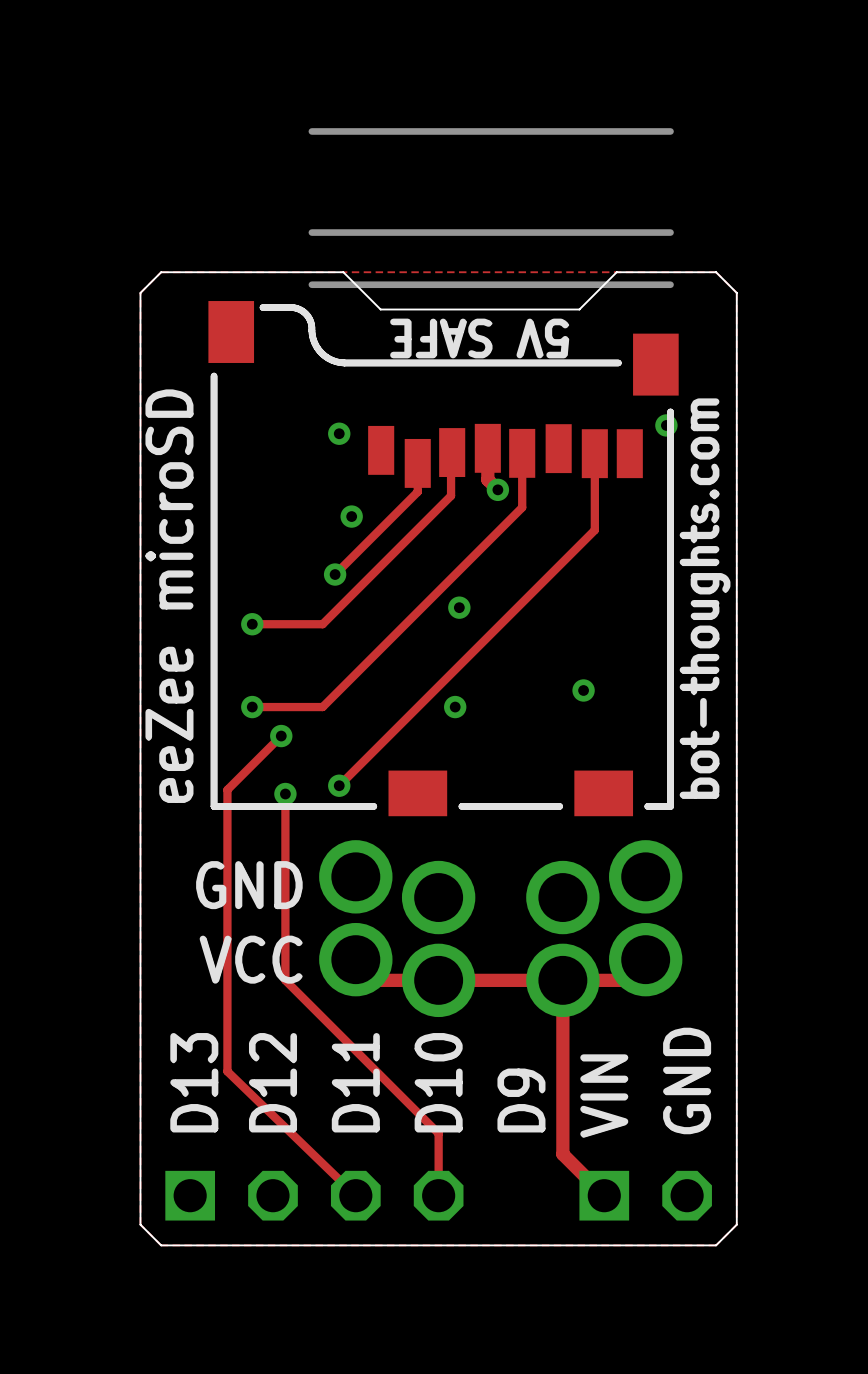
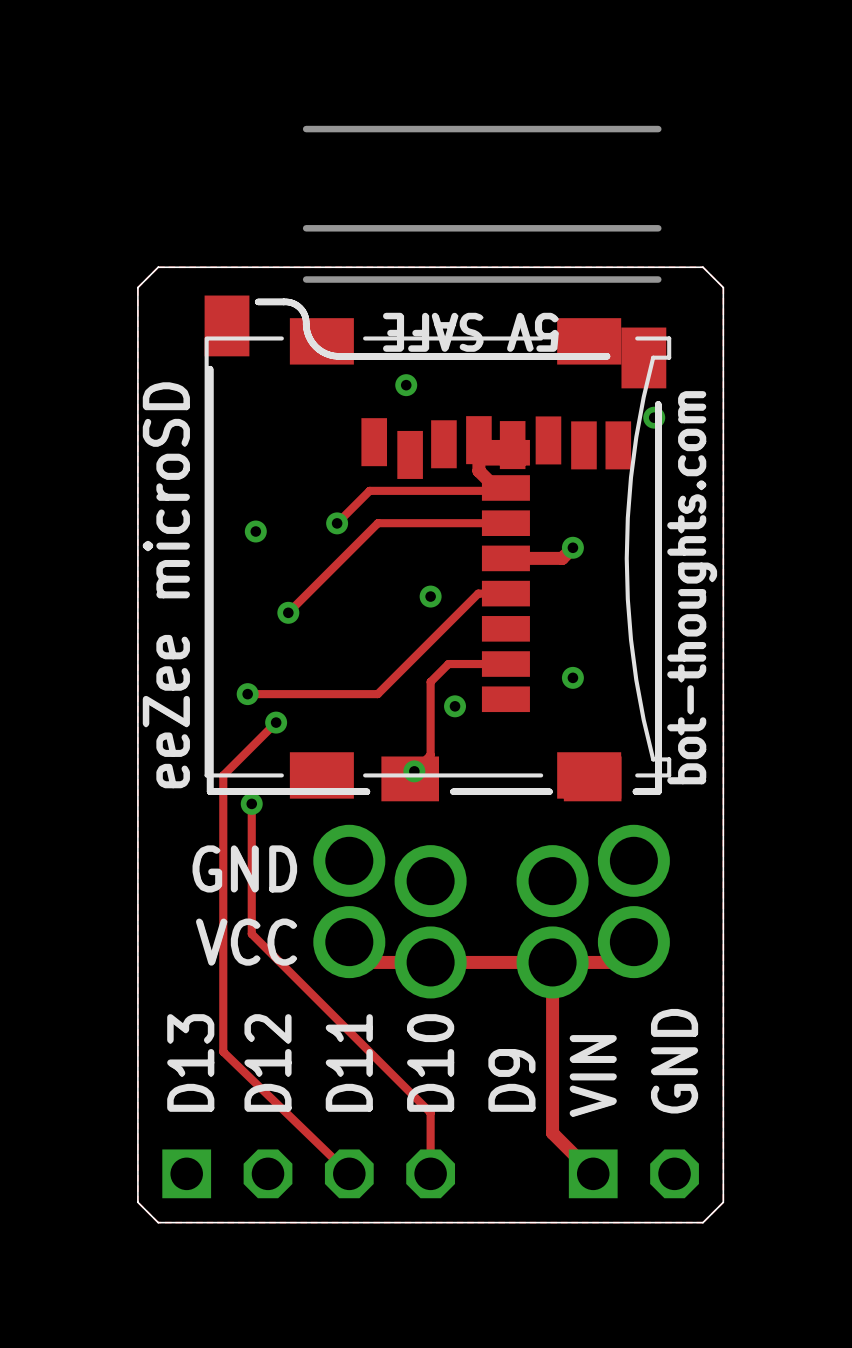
board edge: (343, 272) (380, 309) (579, 309) (616, 272) -> (337, 267) (605, 267)
via: none -> (406, 385)
via: (339, 433) -> none
track: (452, 452) (451, 495) (322, 624) (252, 624) -> none
track: (522, 453) (522, 507) (322, 707) -> (505, 593) (478, 593) (377, 694) (316, 694)
track: (594, 453) (594, 530) (339, 785) -> none
track: (417, 463) (417, 491) (335, 574) -> none
via: (497, 489) -> none
track: none -> (505, 487) (495, 487) (495, 490) (369, 490) (337, 523)
via position: (351, 516) -> (337, 523)
track: none -> (505, 523) (377, 523) (288, 612)
via: none -> (255, 531)
track: none -> (572, 547) (562, 558) (505, 558)
via: none -> (572, 547)
part: none -> (437, 558)
via: (335, 574) -> none
via position: (459, 607) -> (430, 596)
via: (252, 624) -> none
via: none -> (288, 612)
track: none -> (505, 664) (448, 664) (430, 681) (430, 755) (414, 771)
via position: (455, 707) -> (455, 706)
via: (339, 785) -> none
via: none -> (414, 771)
track: (285, 794) (285, 980) -> (251, 803) (251, 933) (280, 962)
via position: (285, 794) -> (251, 803)

